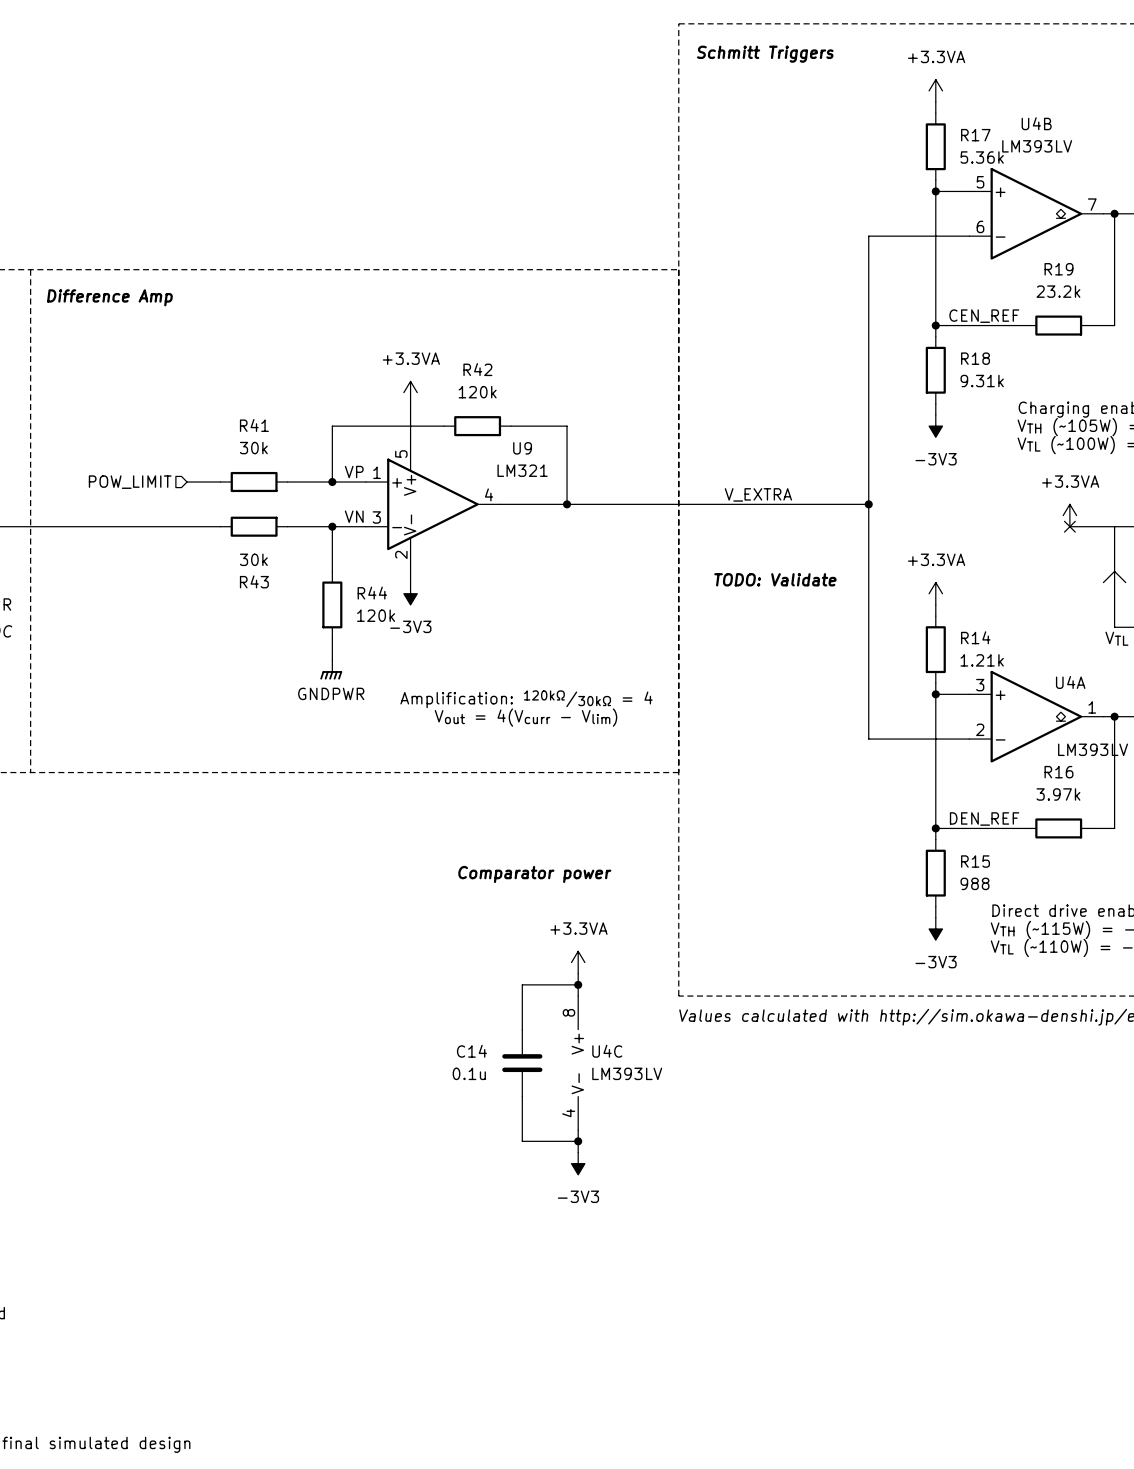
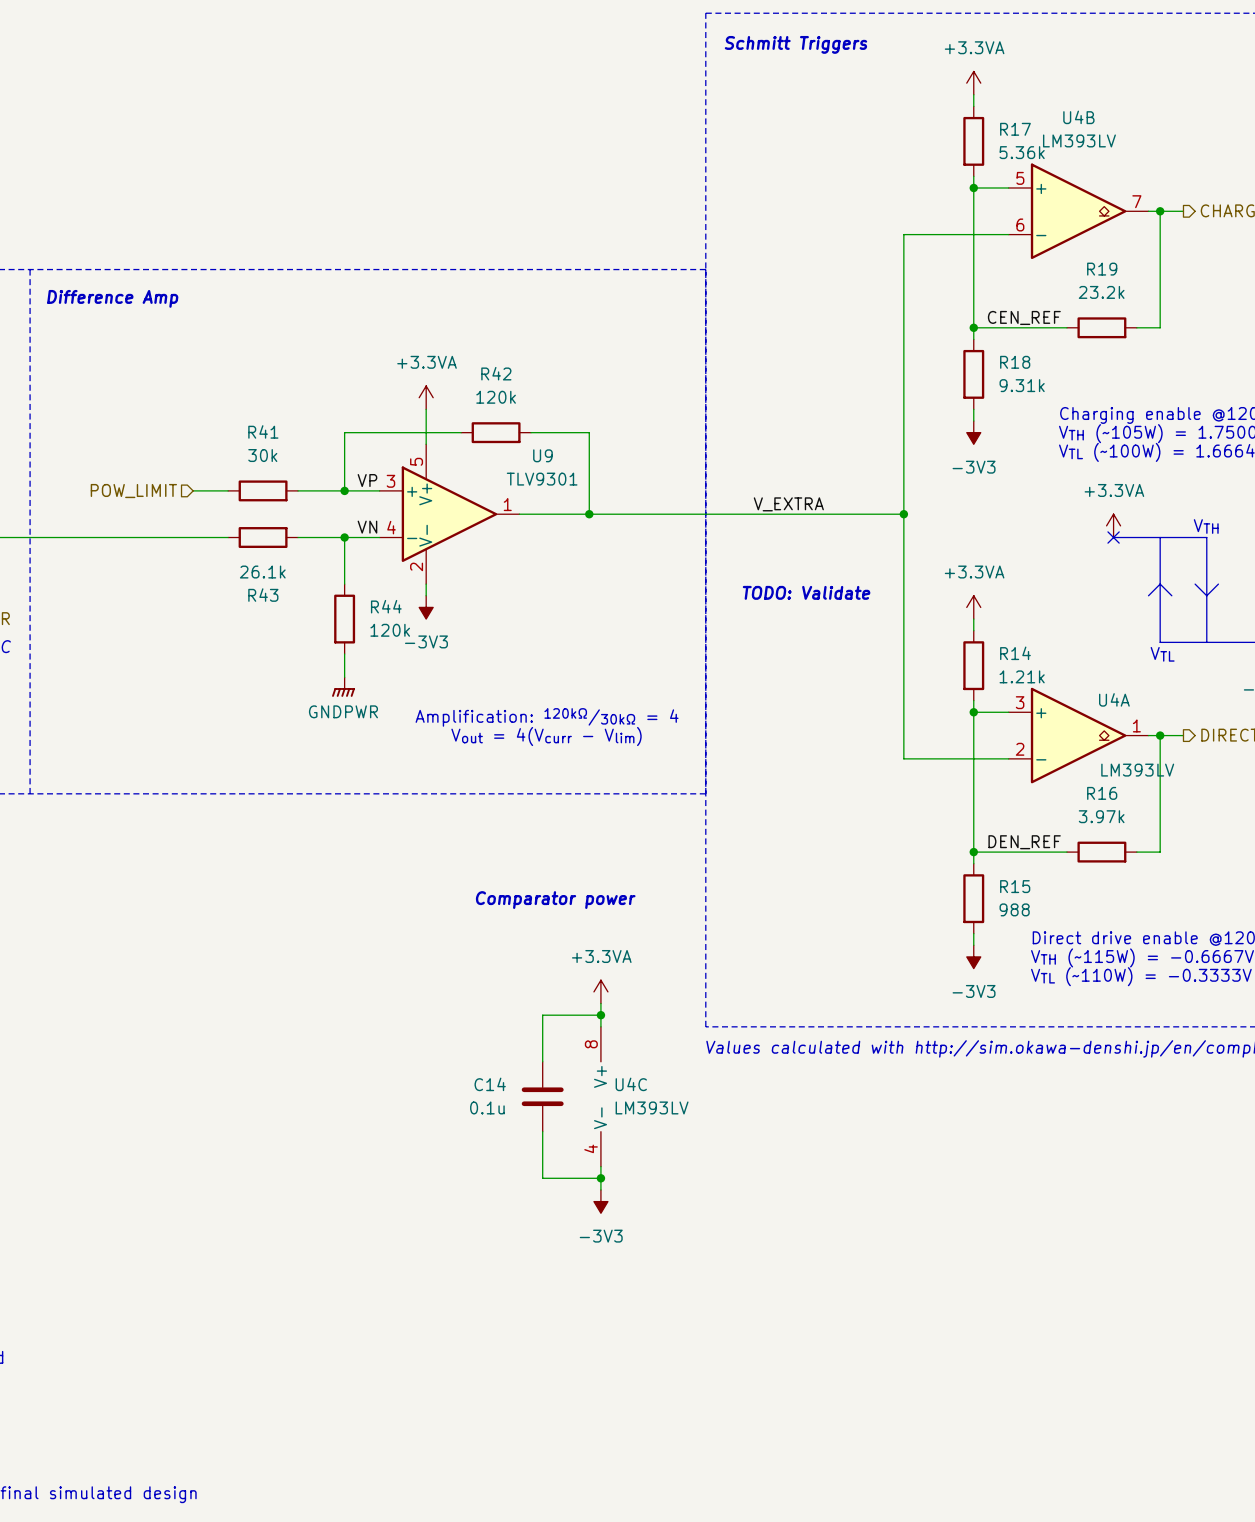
U9 value: LM321 (522, 470) -> TLV9301 (542, 479)
U9 pin number: 1 (377, 472) -> 3 (390, 481)
U9 pin number: 4 (489, 494) -> 1 (507, 504)
U9 pin number: 3 (376, 517) -> 4 (391, 527)
R43 value: 30k (253, 559) -> 26.1k (262, 572)

